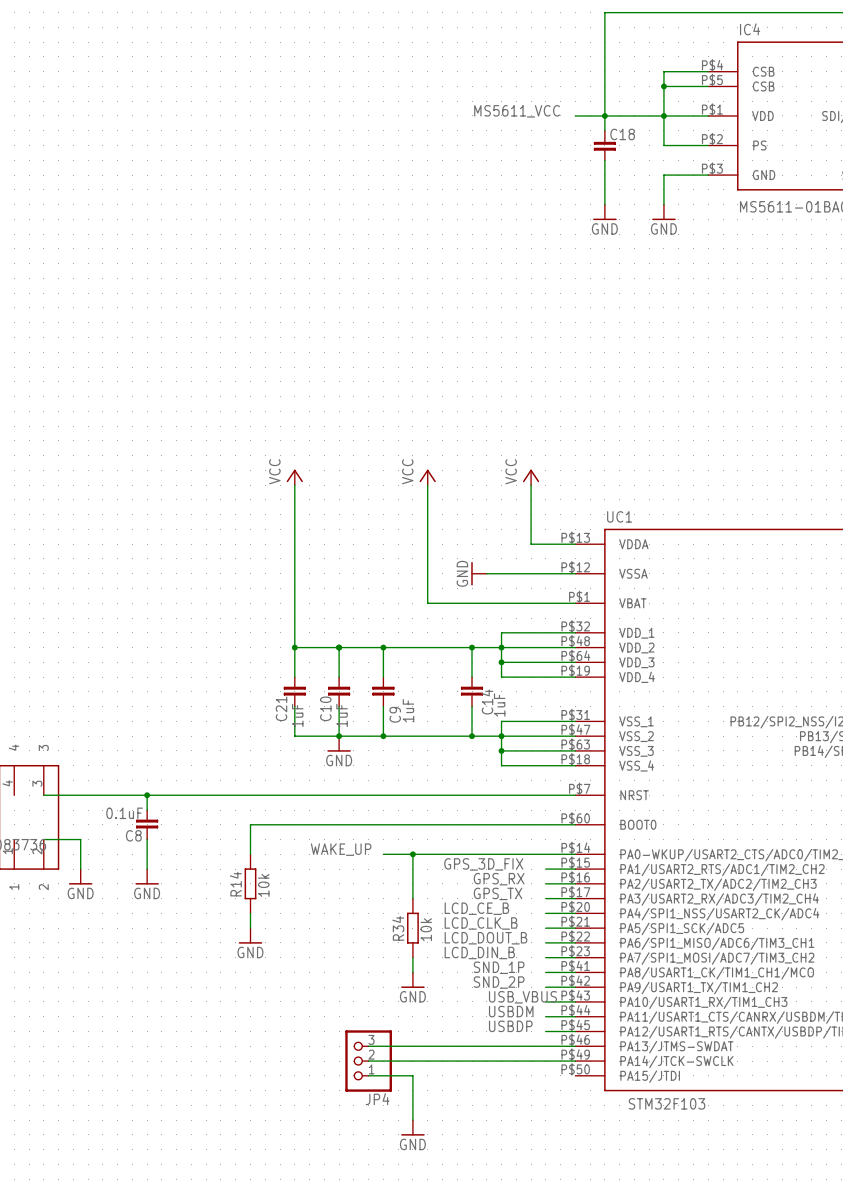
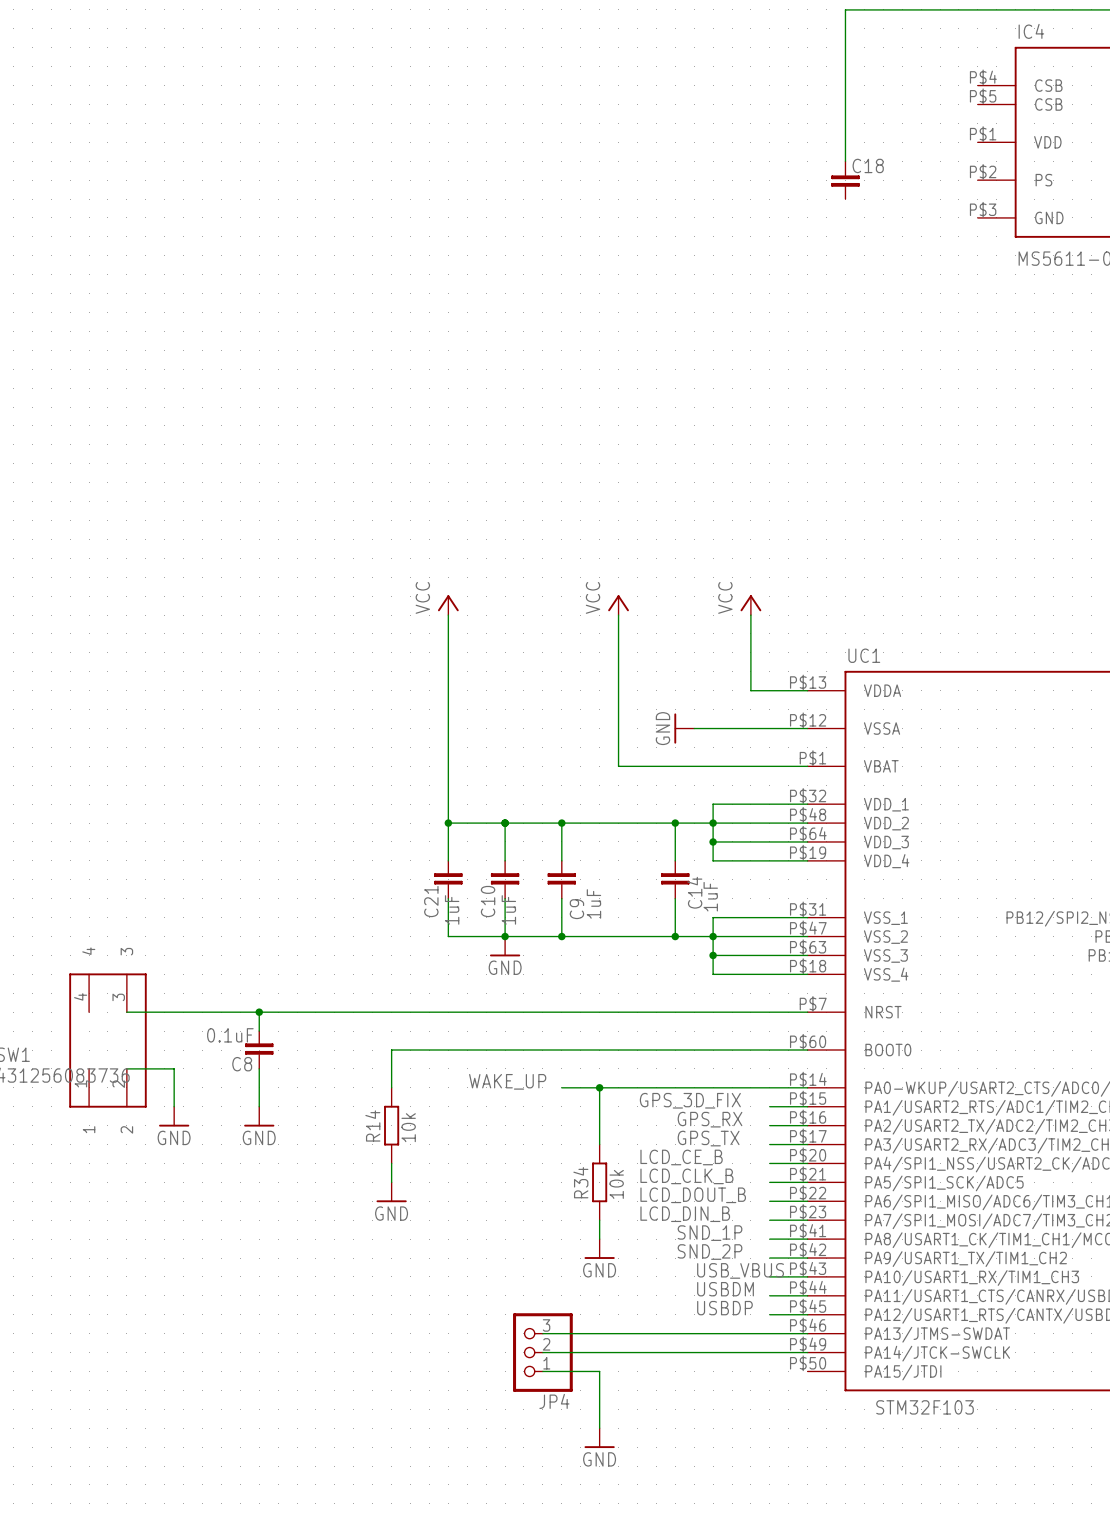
wire: (708, 71) (663, 71) (663, 145) (708, 145) -> none
wire: (663, 86) (708, 86) -> none
junction: (663, 86) -> none
label: MS5611_VCC (517, 111) -> none
wire: (575, 115) (708, 115) -> none
junction: (604, 115) -> none
junction: (663, 115) -> none
wire: (604, 160) (604, 204) -> none
wire: (708, 175) (663, 175) (663, 204) -> none
power symbol: GND (604, 212) -> none
power symbol: GND (663, 212) -> none

